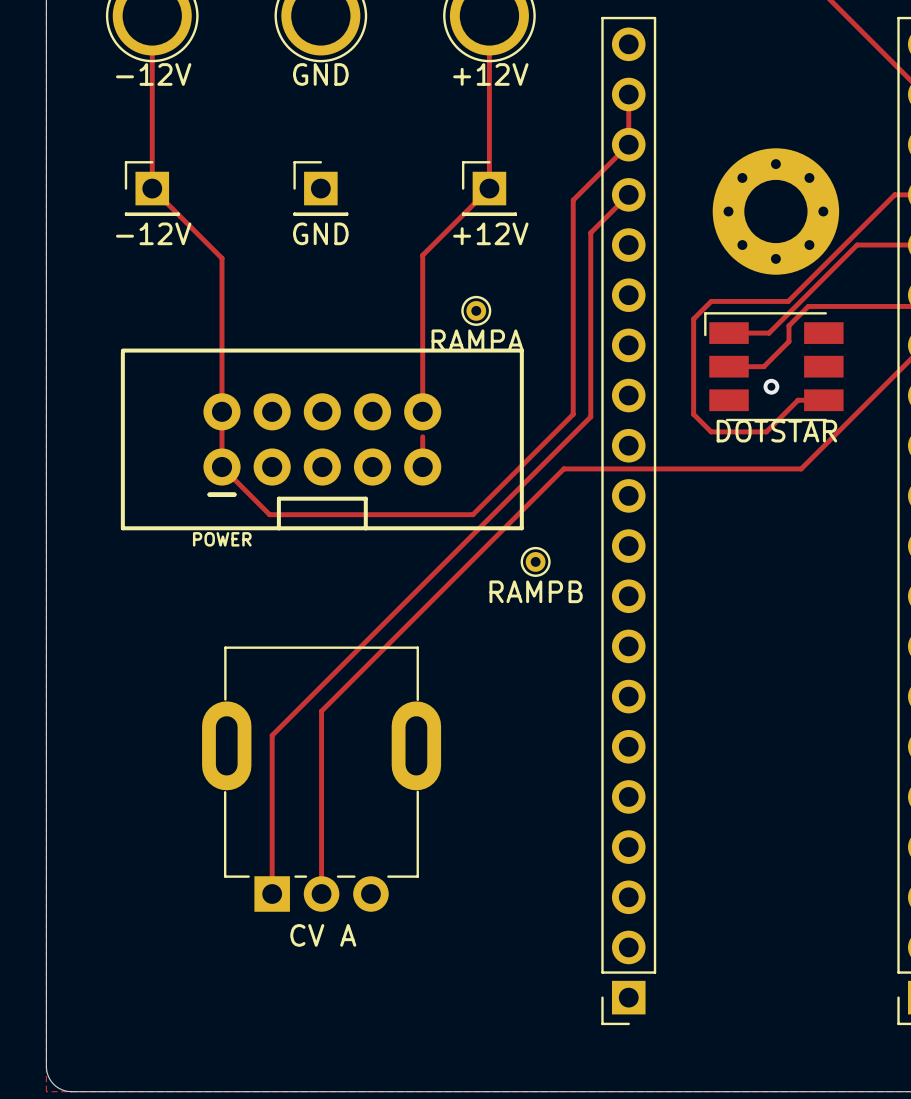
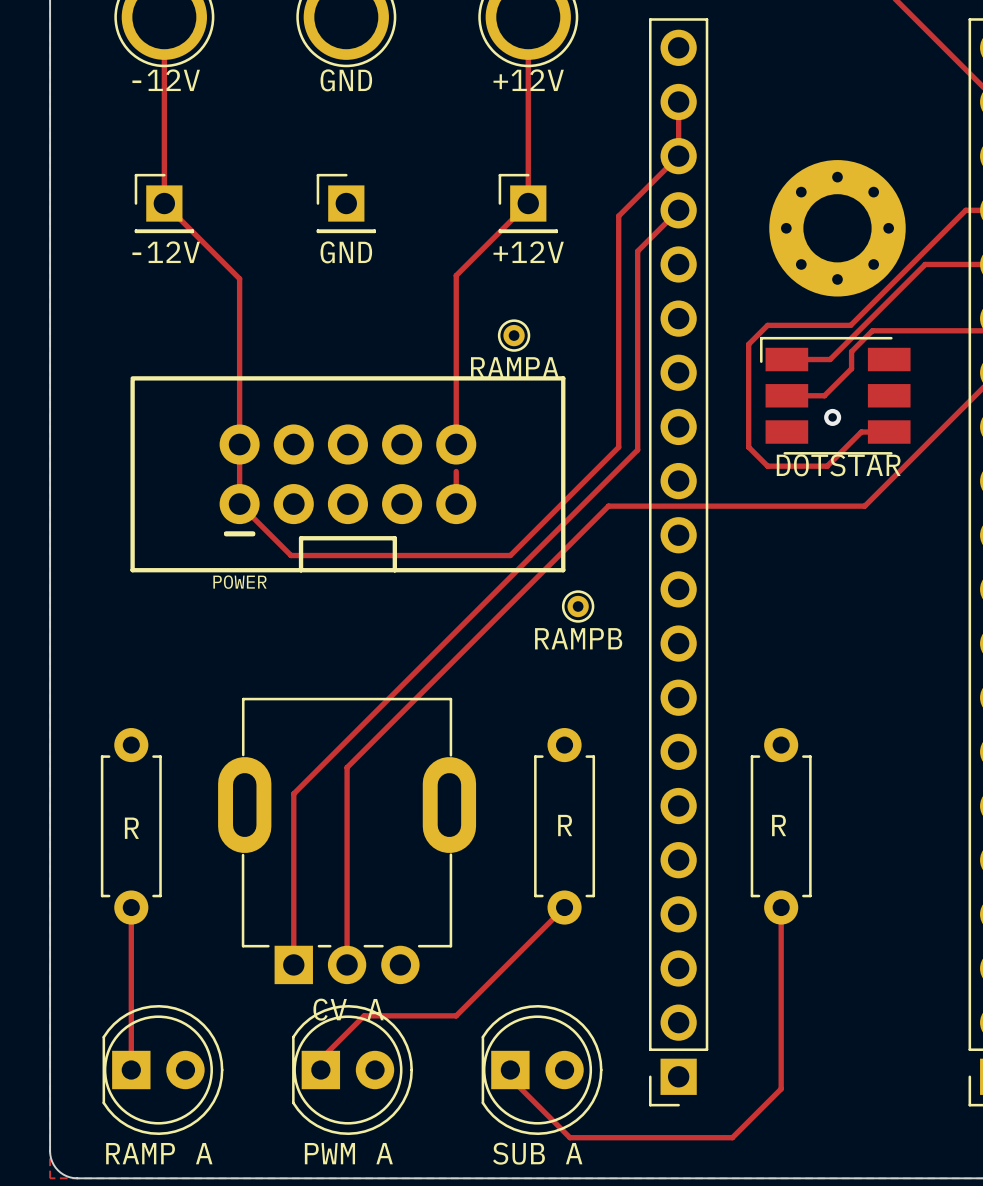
part: none -> R (131, 826)
part: none -> R (564, 826)
part: none -> R (781, 826)
track: none -> (131, 907) (131, 1070)
track: none -> (564, 907) (456, 1015) (364, 1015) (320, 1059) (320, 1070)
track: none -> (781, 907) (781, 1088) (732, 1137) (569, 1137) (510, 1078) (510, 1070)
part: none -> RAMP A (162, 1070)
part: none -> PWM A (352, 1070)
part: none -> SUB A (542, 1070)

